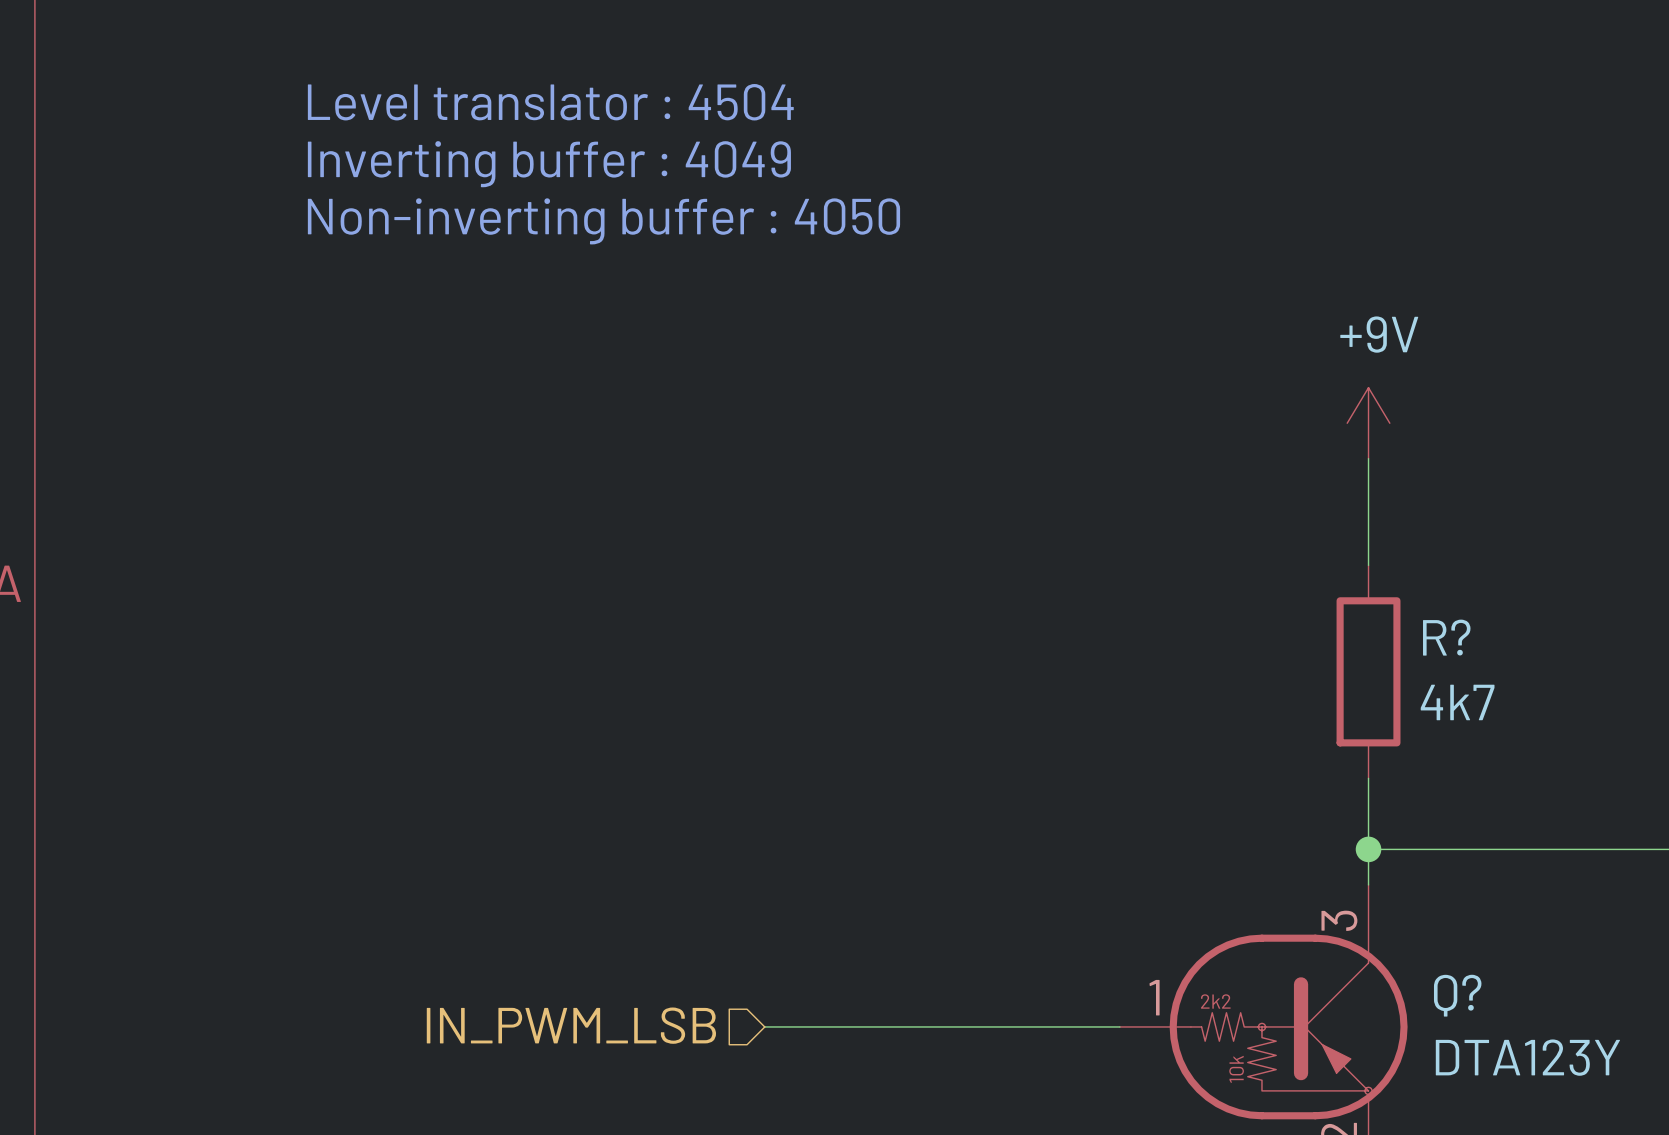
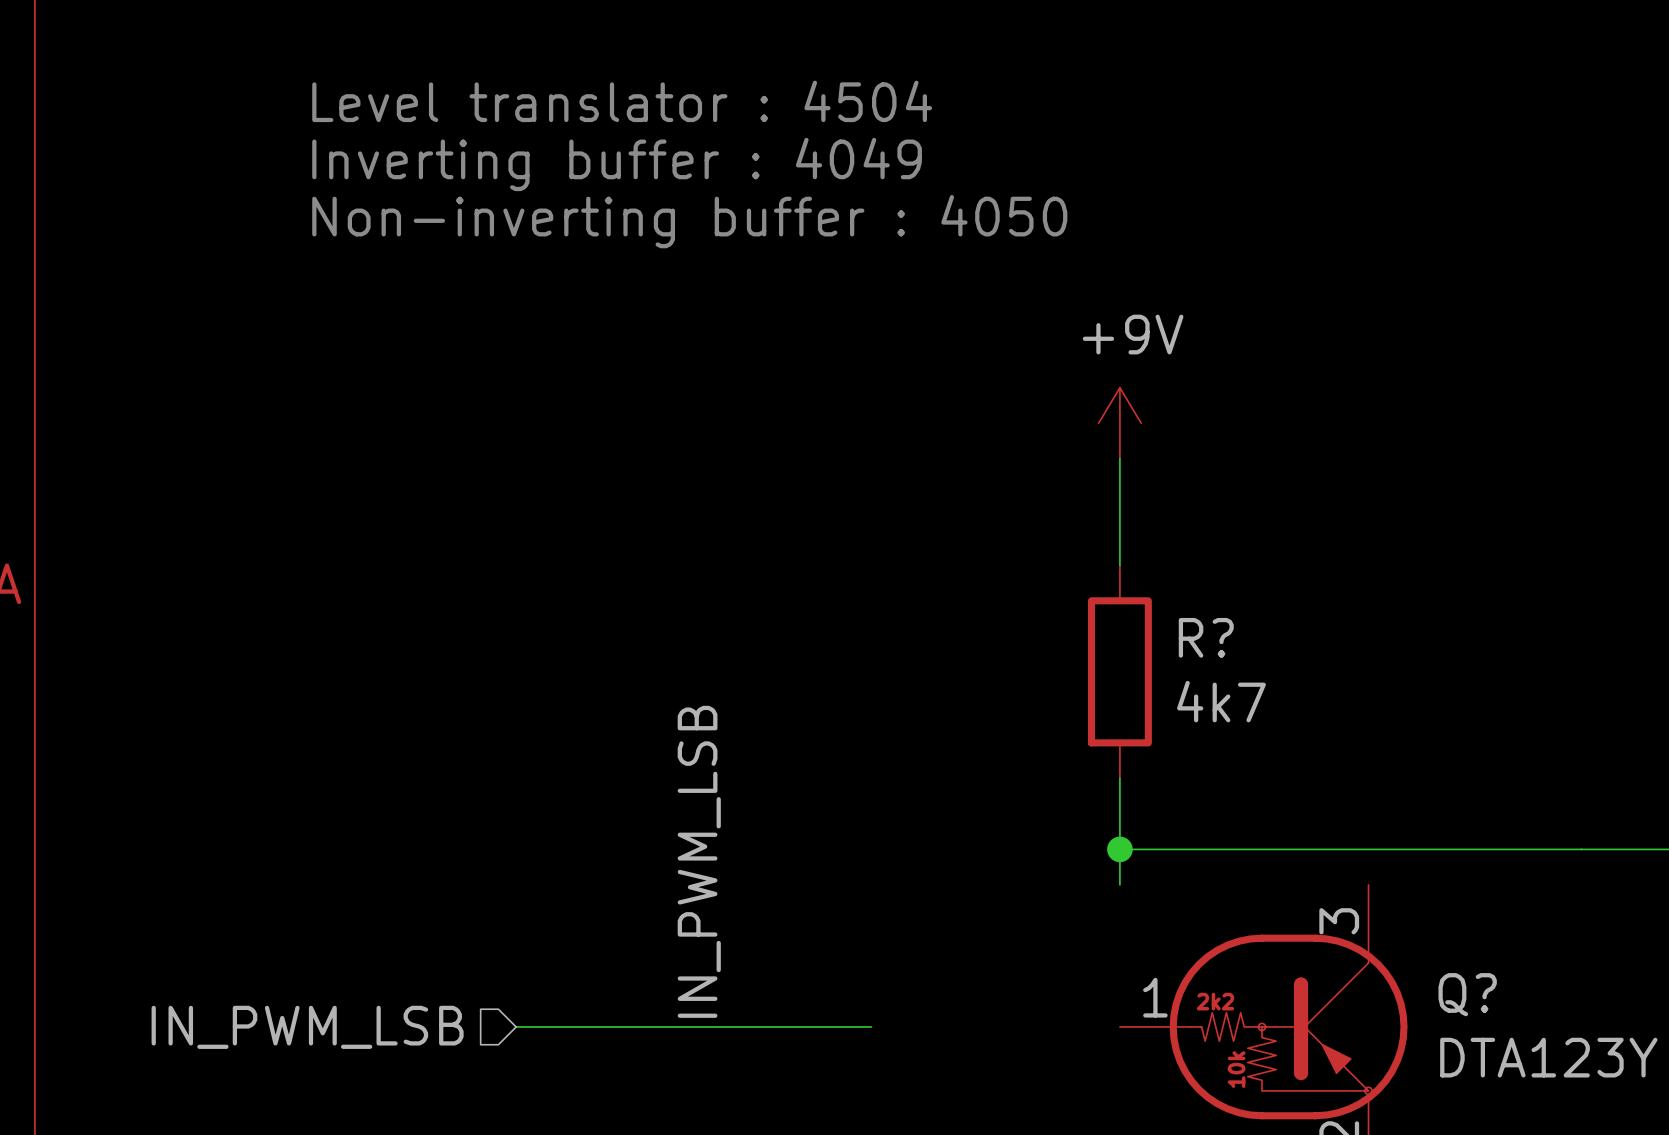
power symbol position: +9V (1368, 423) -> +9V (1119, 423)
wire: (1368, 458) (1368, 565) -> (1119, 458) (1119, 565)
R? position: (1368, 671) -> (1119, 671)
wire: (1368, 778) (1368, 884) -> (1119, 778) (1119, 884)
junction: none -> (1119, 849)
junction: (1368, 849) -> none
label: none -> IN_PWM_LSB (699, 861)
hierarchical label position: IN_PWM_LSB (571, 1025) -> IN_PWM_LSB (307, 1027)
wire: none -> (516, 1026) (764, 1026)
wire: (871, 1026) (1119, 1026) -> (1119, 849) (1368, 849)

